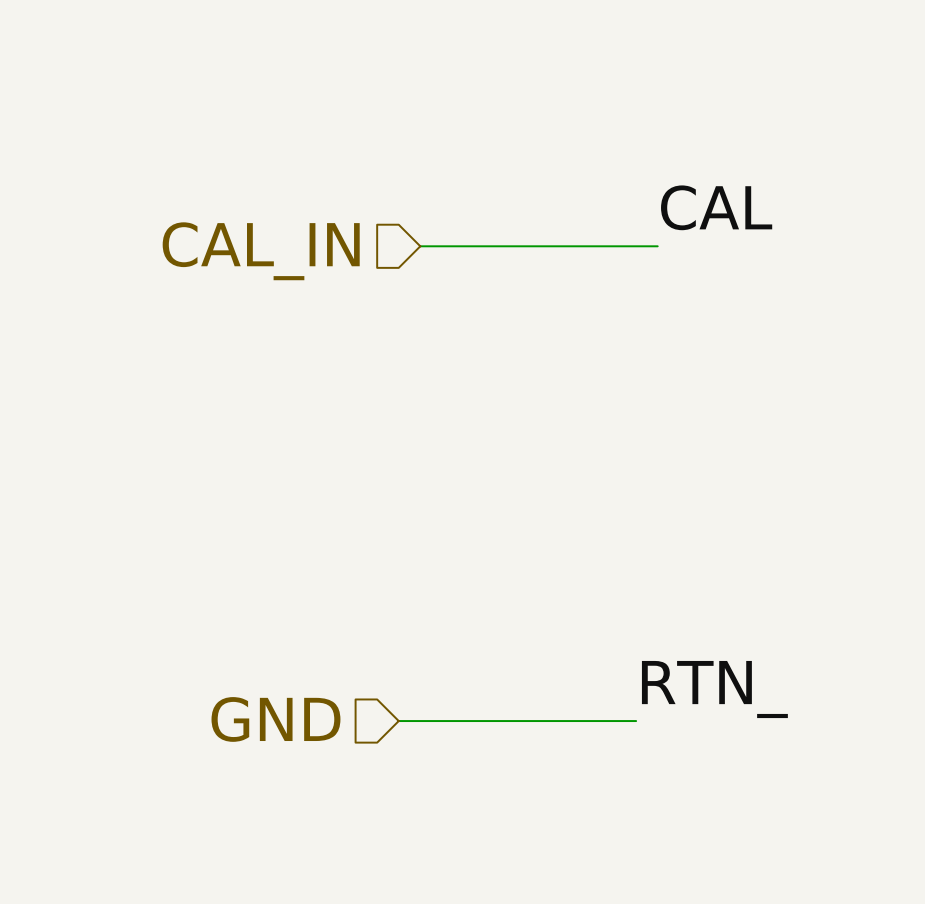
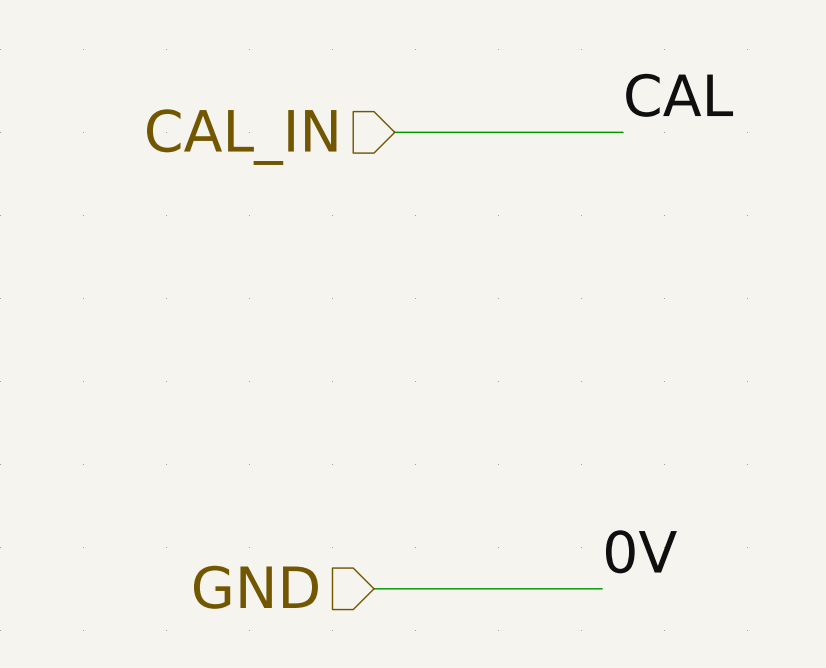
label: RTN_ (714, 689) -> 0V (641, 551)

